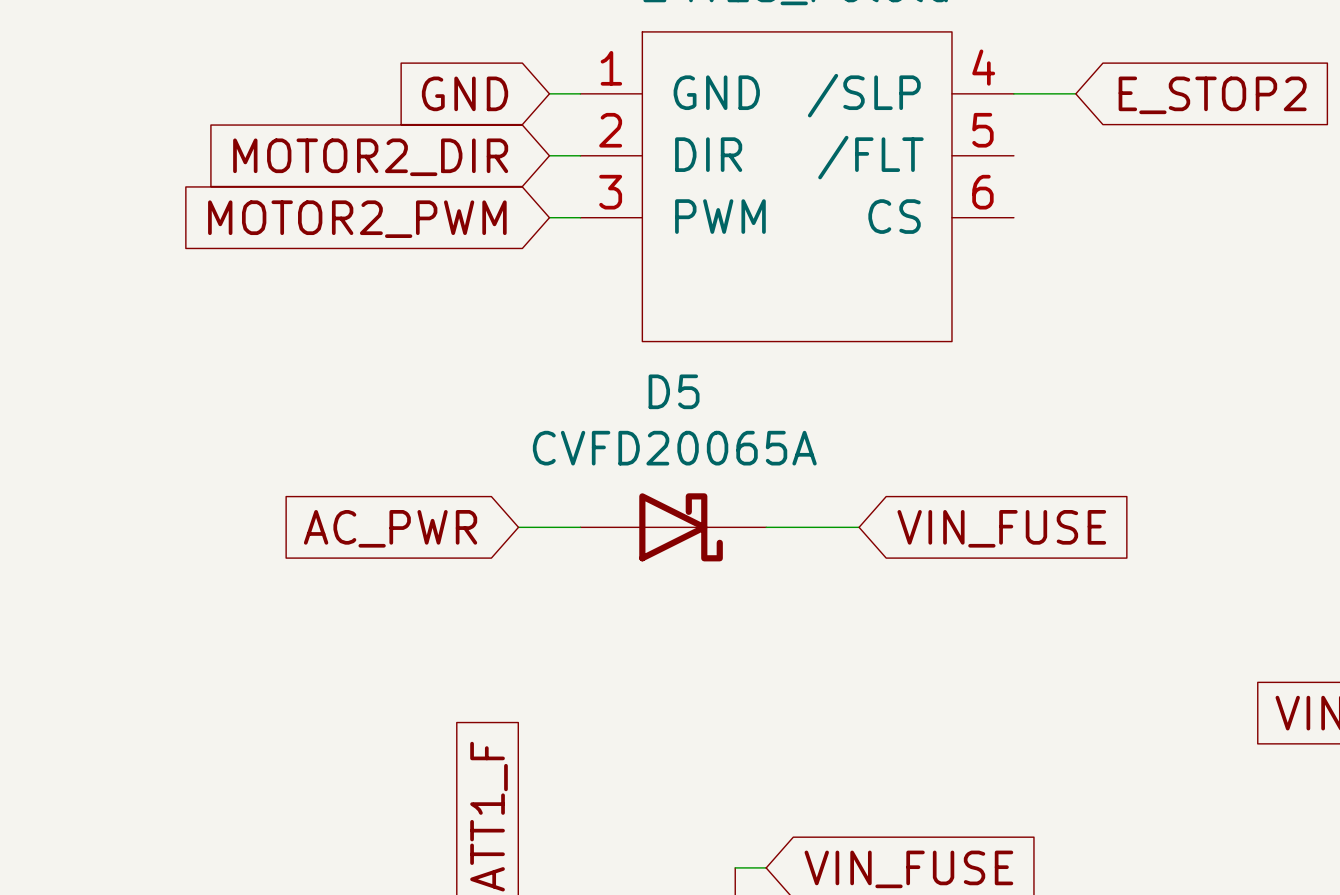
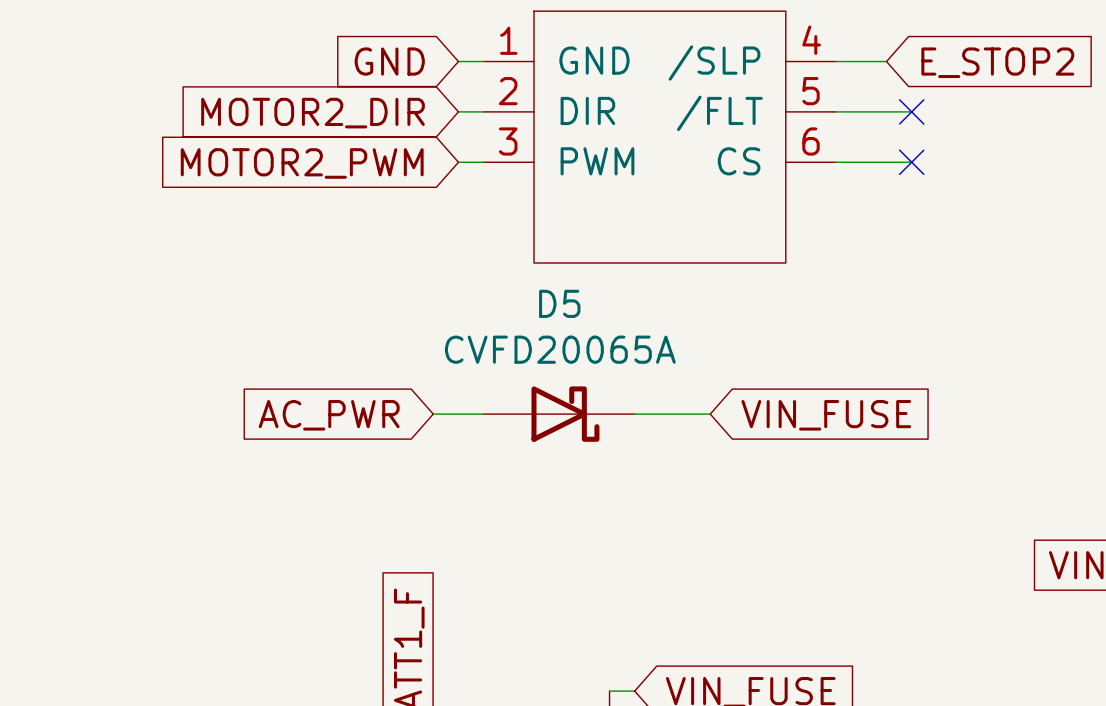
wire: none -> (836, 111) (911, 111)
no-connect mark: none -> (911, 111)
wire: none -> (836, 162) (911, 162)
no-connect mark: none -> (911, 162)

